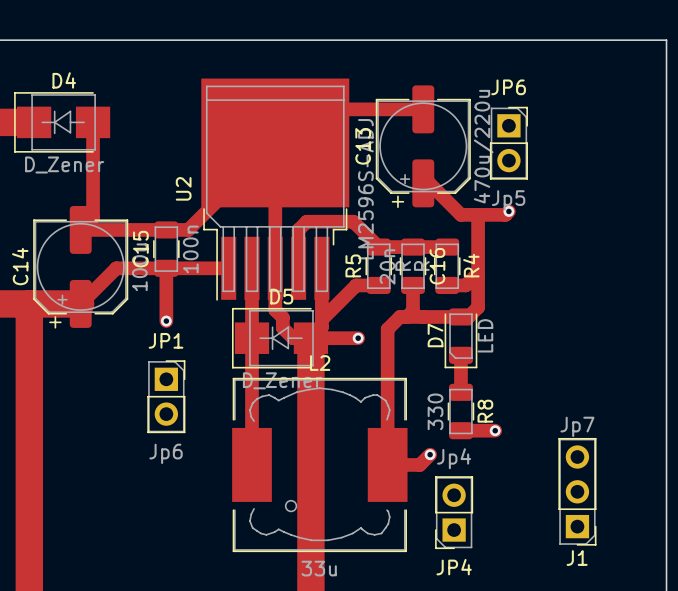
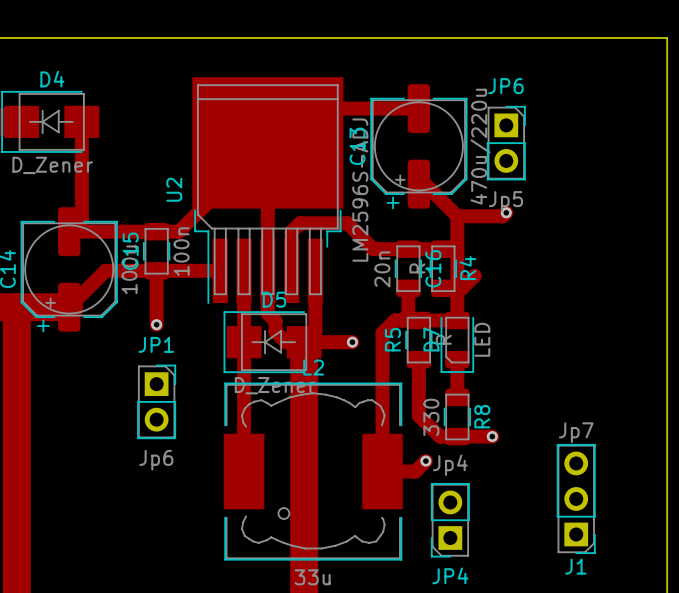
track: (478, 214) (478, 307) (468, 316) (460, 316) -> (457, 216) (457, 320)
R5 position: (378, 266) -> (418, 340)
track: (378, 285) (356, 285) (321, 319) -> none
track: none -> (418, 359) (418, 415) (439, 436) (457, 436)

